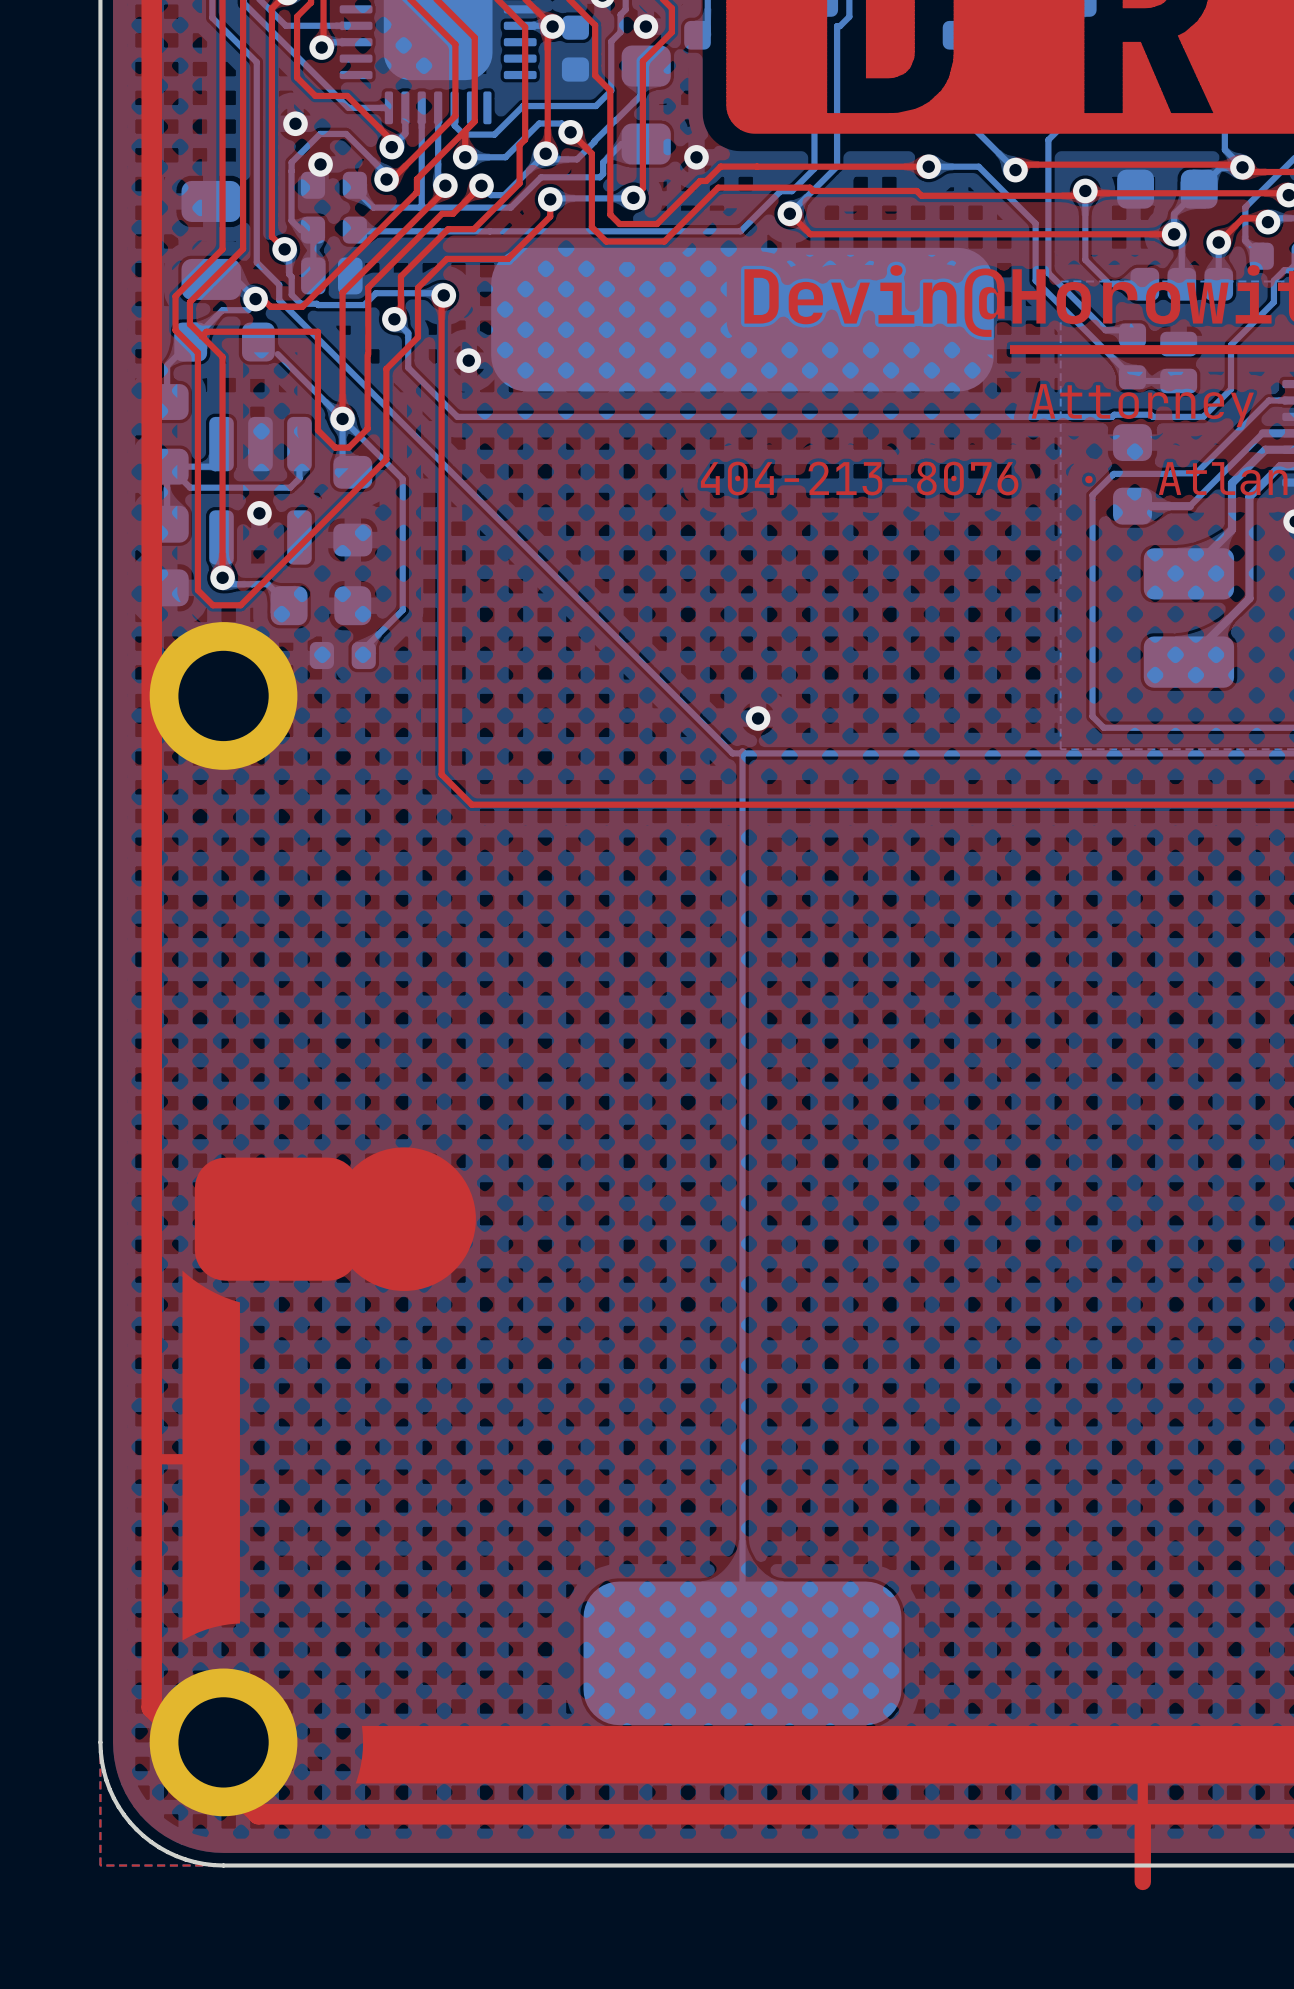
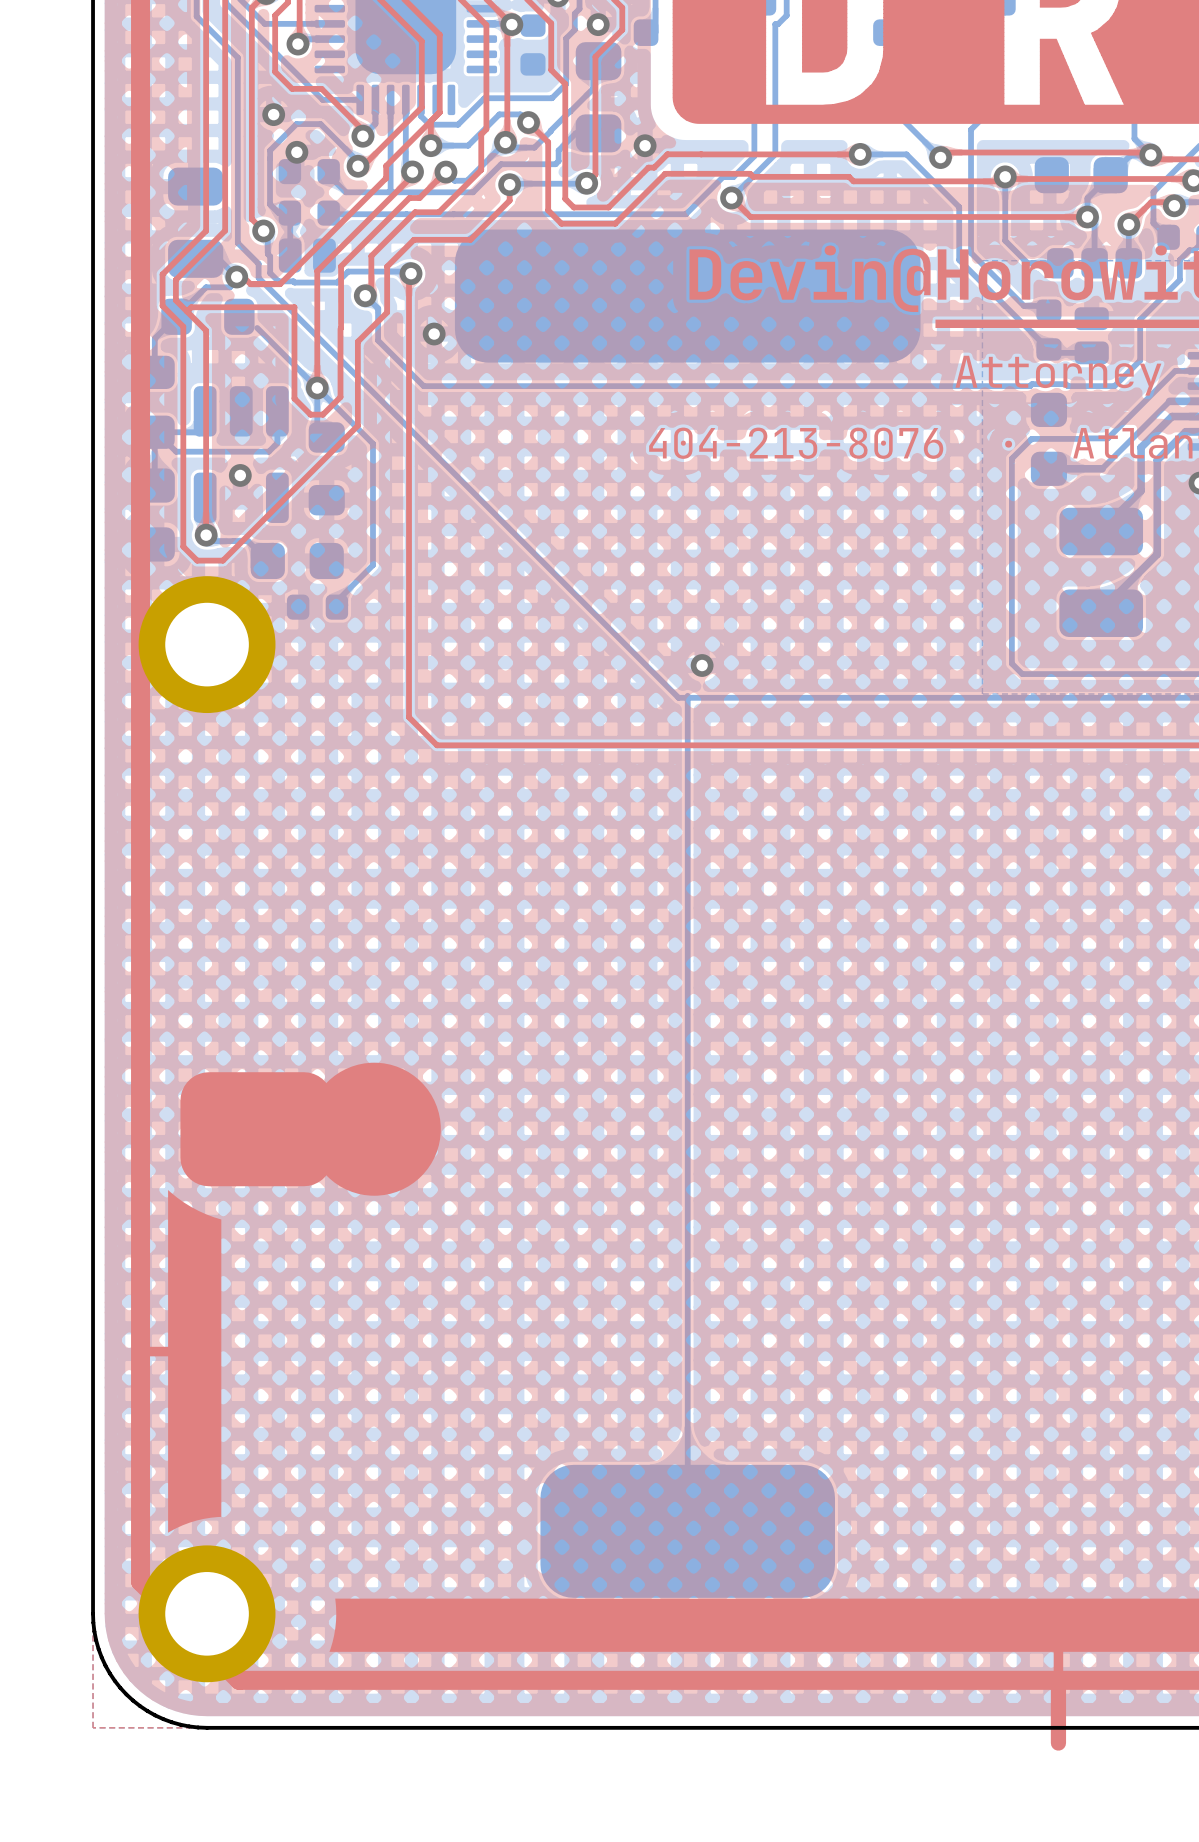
drawing position: (211, 1455) -> (194, 1361)

